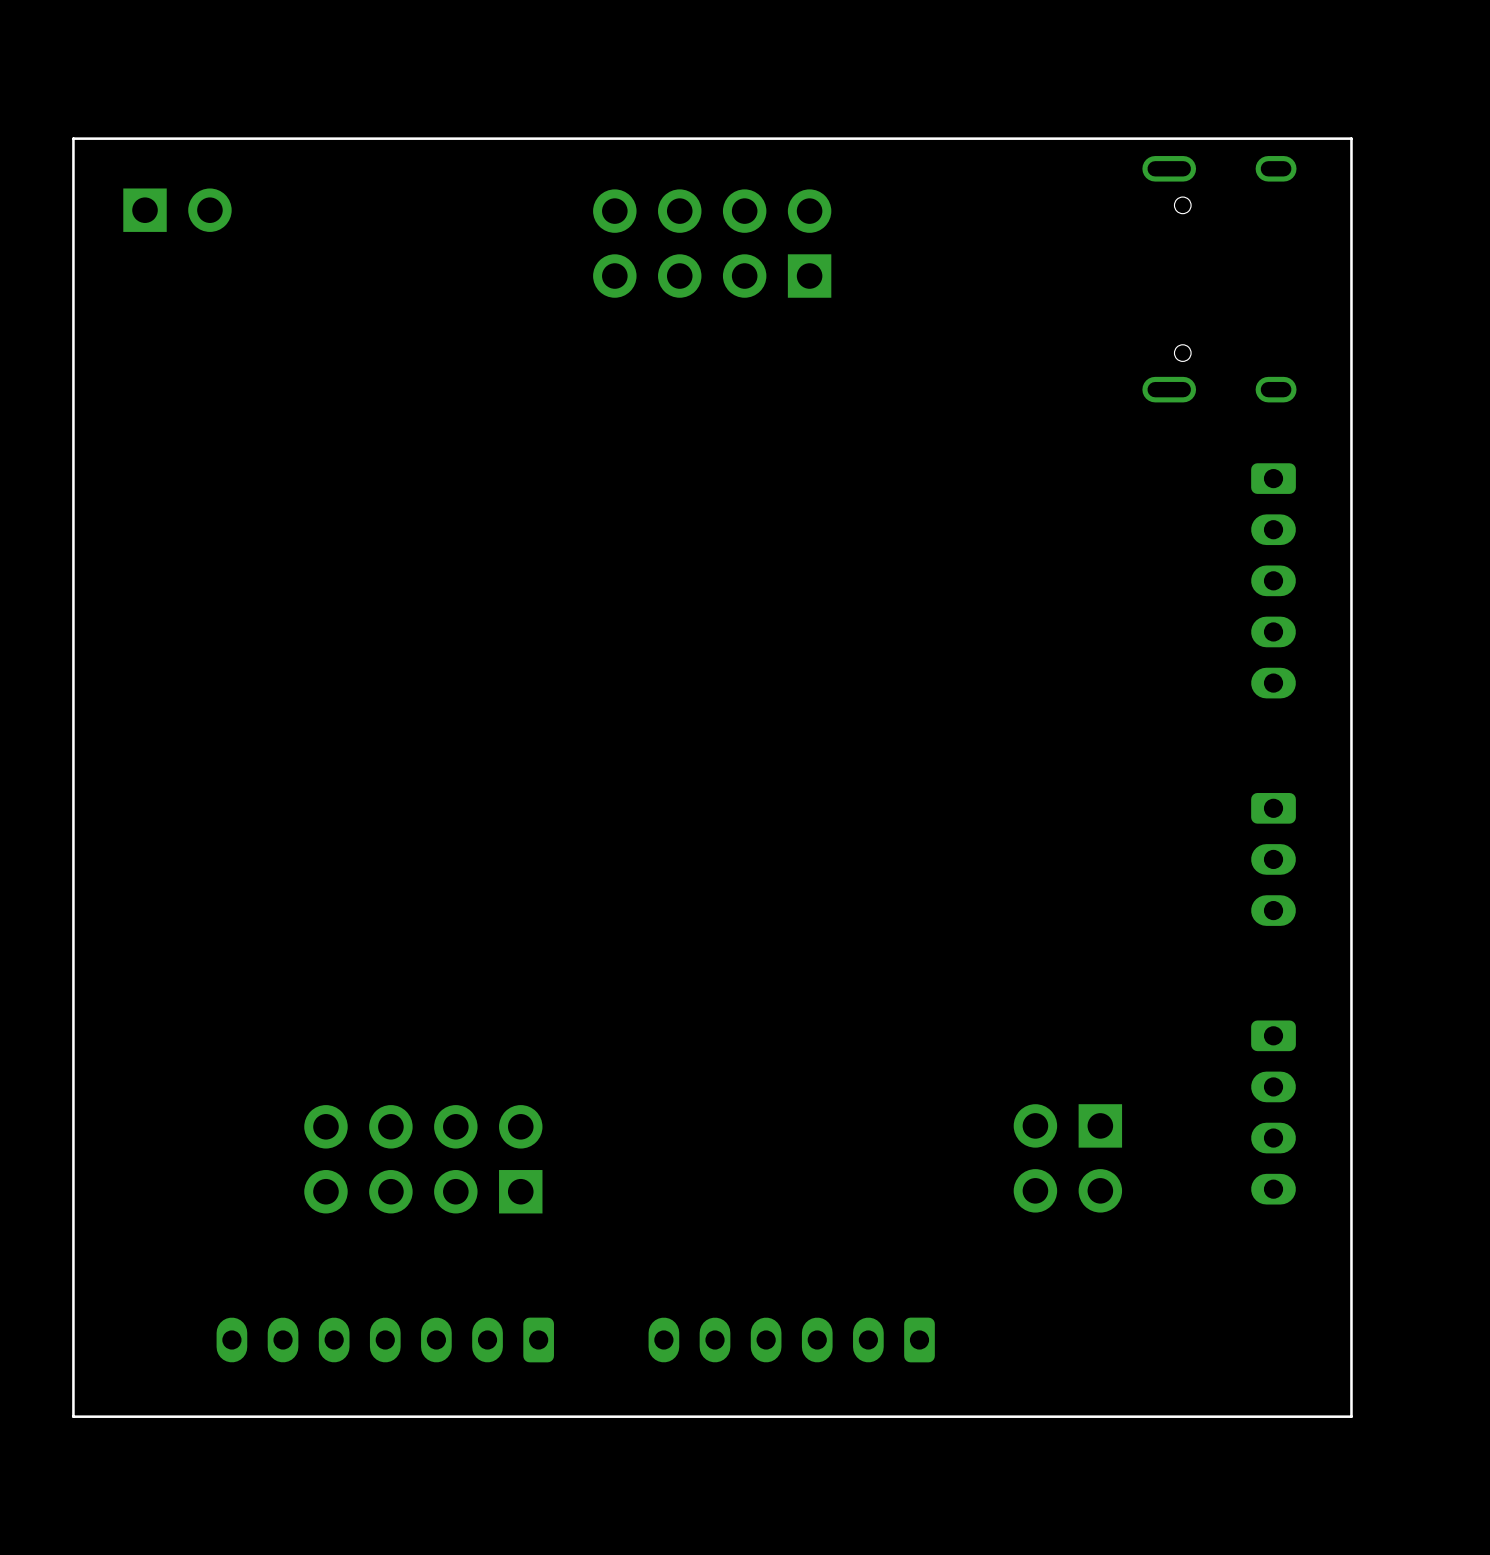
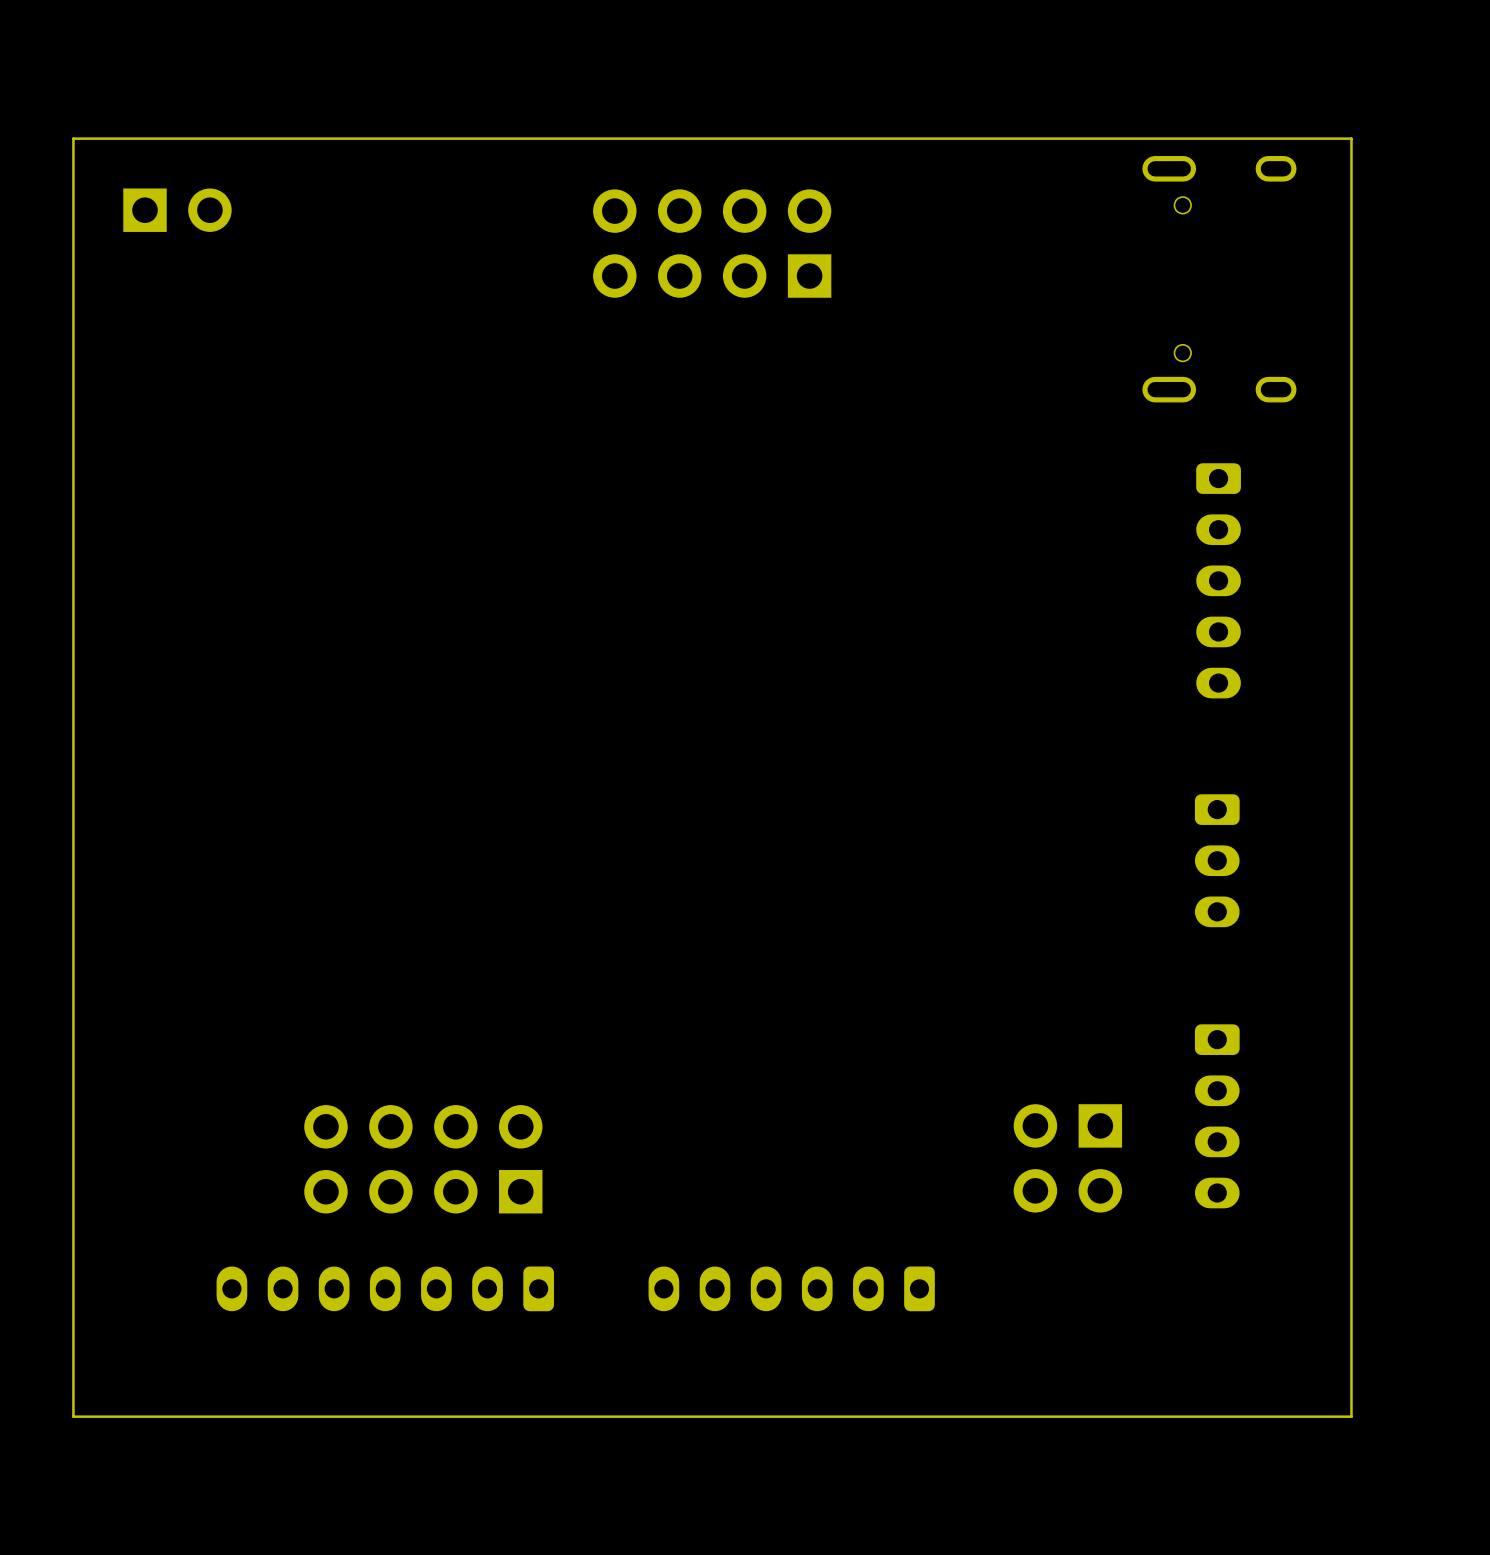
part position: (1273, 580) -> (1218, 580)
part position: (1273, 859) -> (1217, 860)
part position: (1273, 1112) -> (1217, 1116)
part position: (385, 1339) -> (385, 1288)
part position: (791, 1339) -> (791, 1288)

